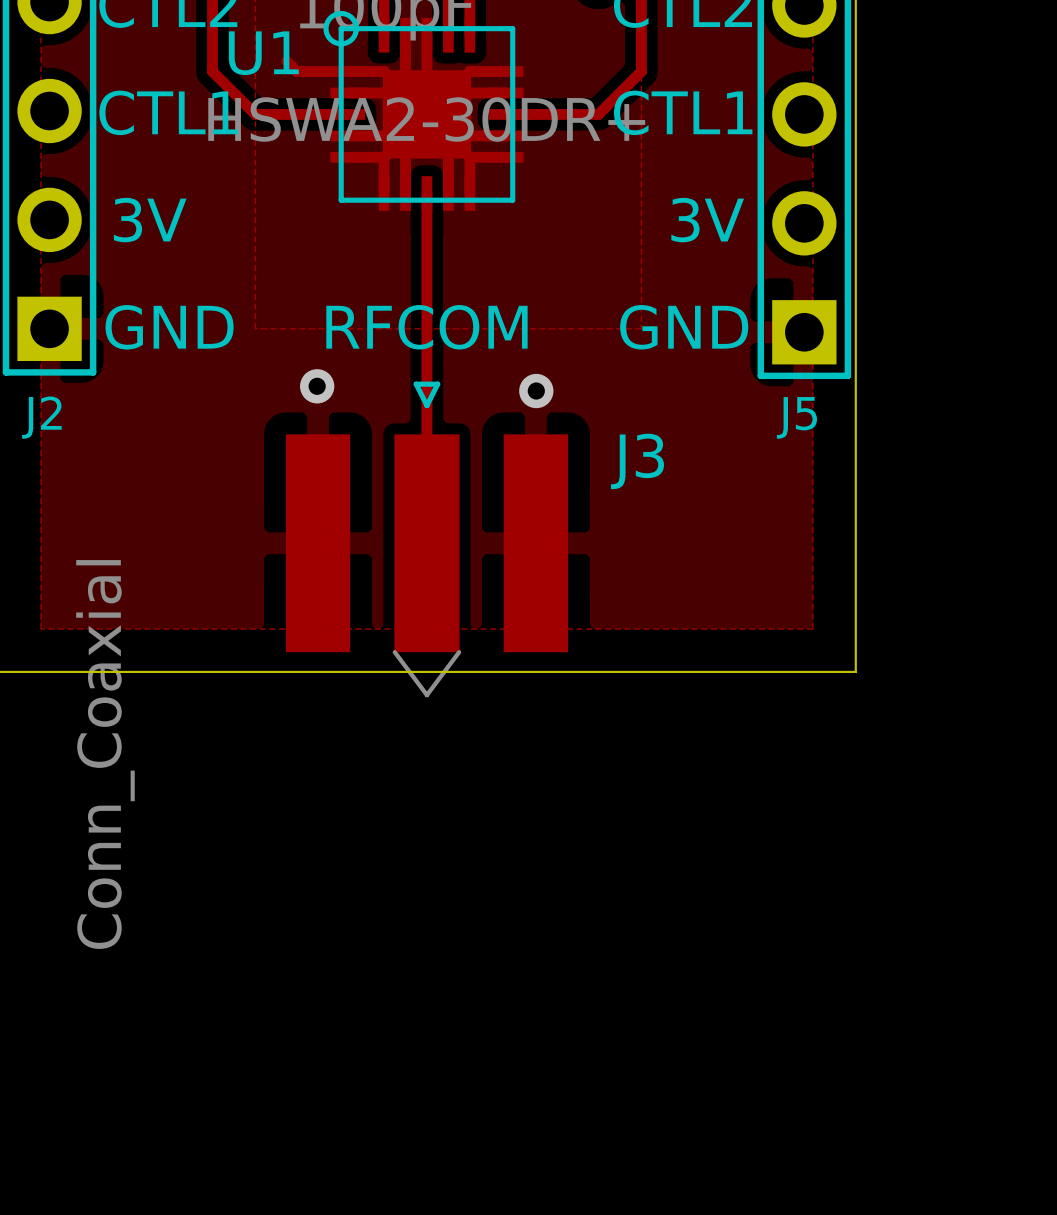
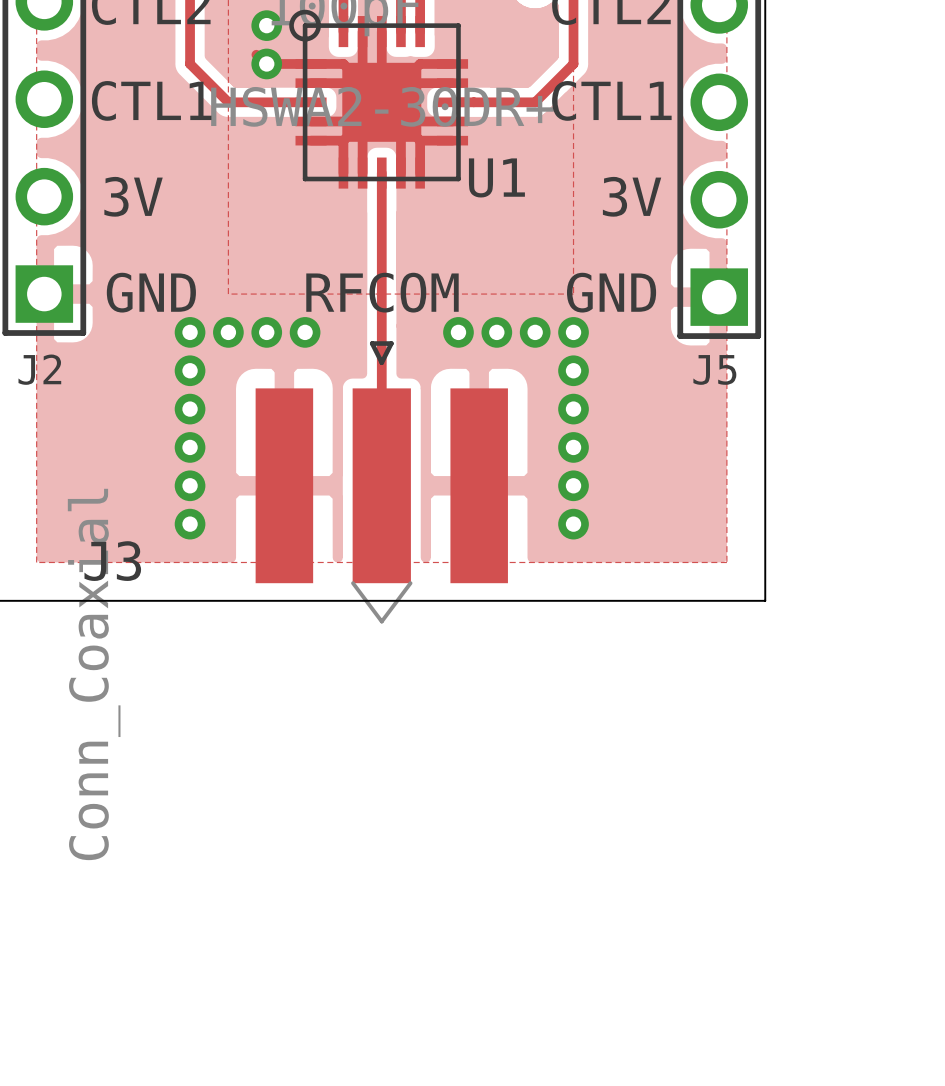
via: none -> (266, 25)
U1 name position: U1 (263, 53) -> U1 (496, 177)
via: none -> (266, 63)
via: none -> (190, 332)
via: none -> (228, 332)
via: none -> (266, 332)
via: none -> (305, 332)
via: none -> (458, 332)
via: none -> (496, 332)
via: none -> (535, 332)
via: none -> (573, 332)
via: (317, 386) -> none
via: (536, 391) -> none
via: none -> (190, 370)
via: none -> (573, 370)
via: none -> (190, 409)
via: none -> (573, 409)
J3 name position: J3 (637, 461) -> J3 (112, 561)
via: none -> (190, 447)
via: none -> (573, 447)
via: none -> (190, 485)
via: none -> (573, 485)
via: none -> (190, 524)
via: none -> (573, 524)

